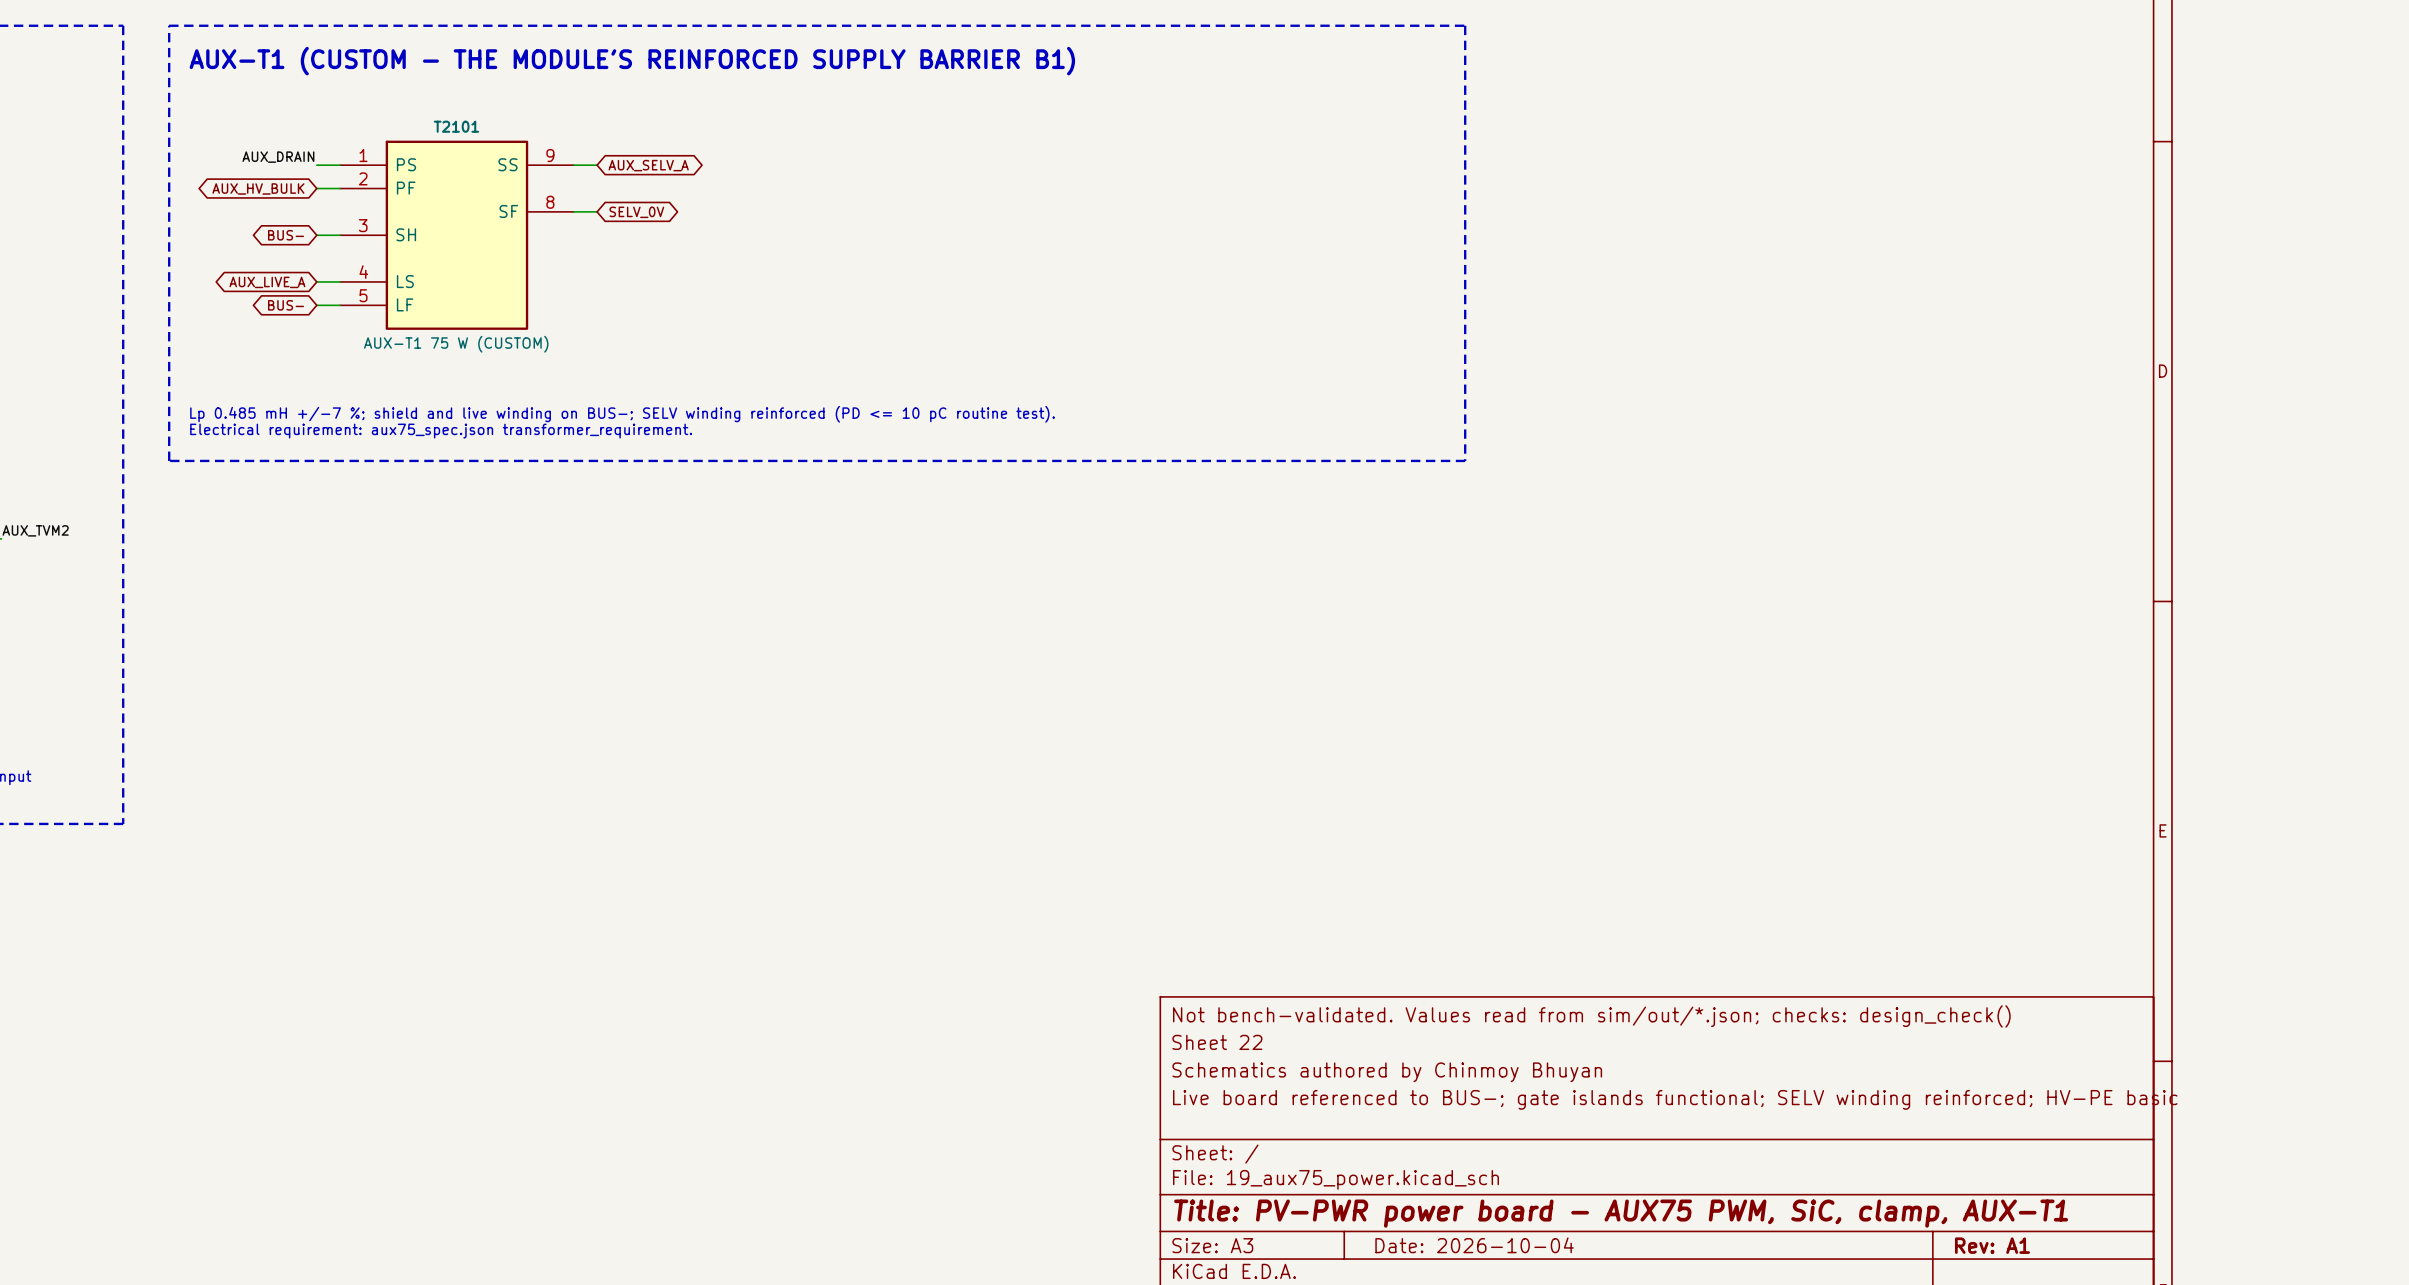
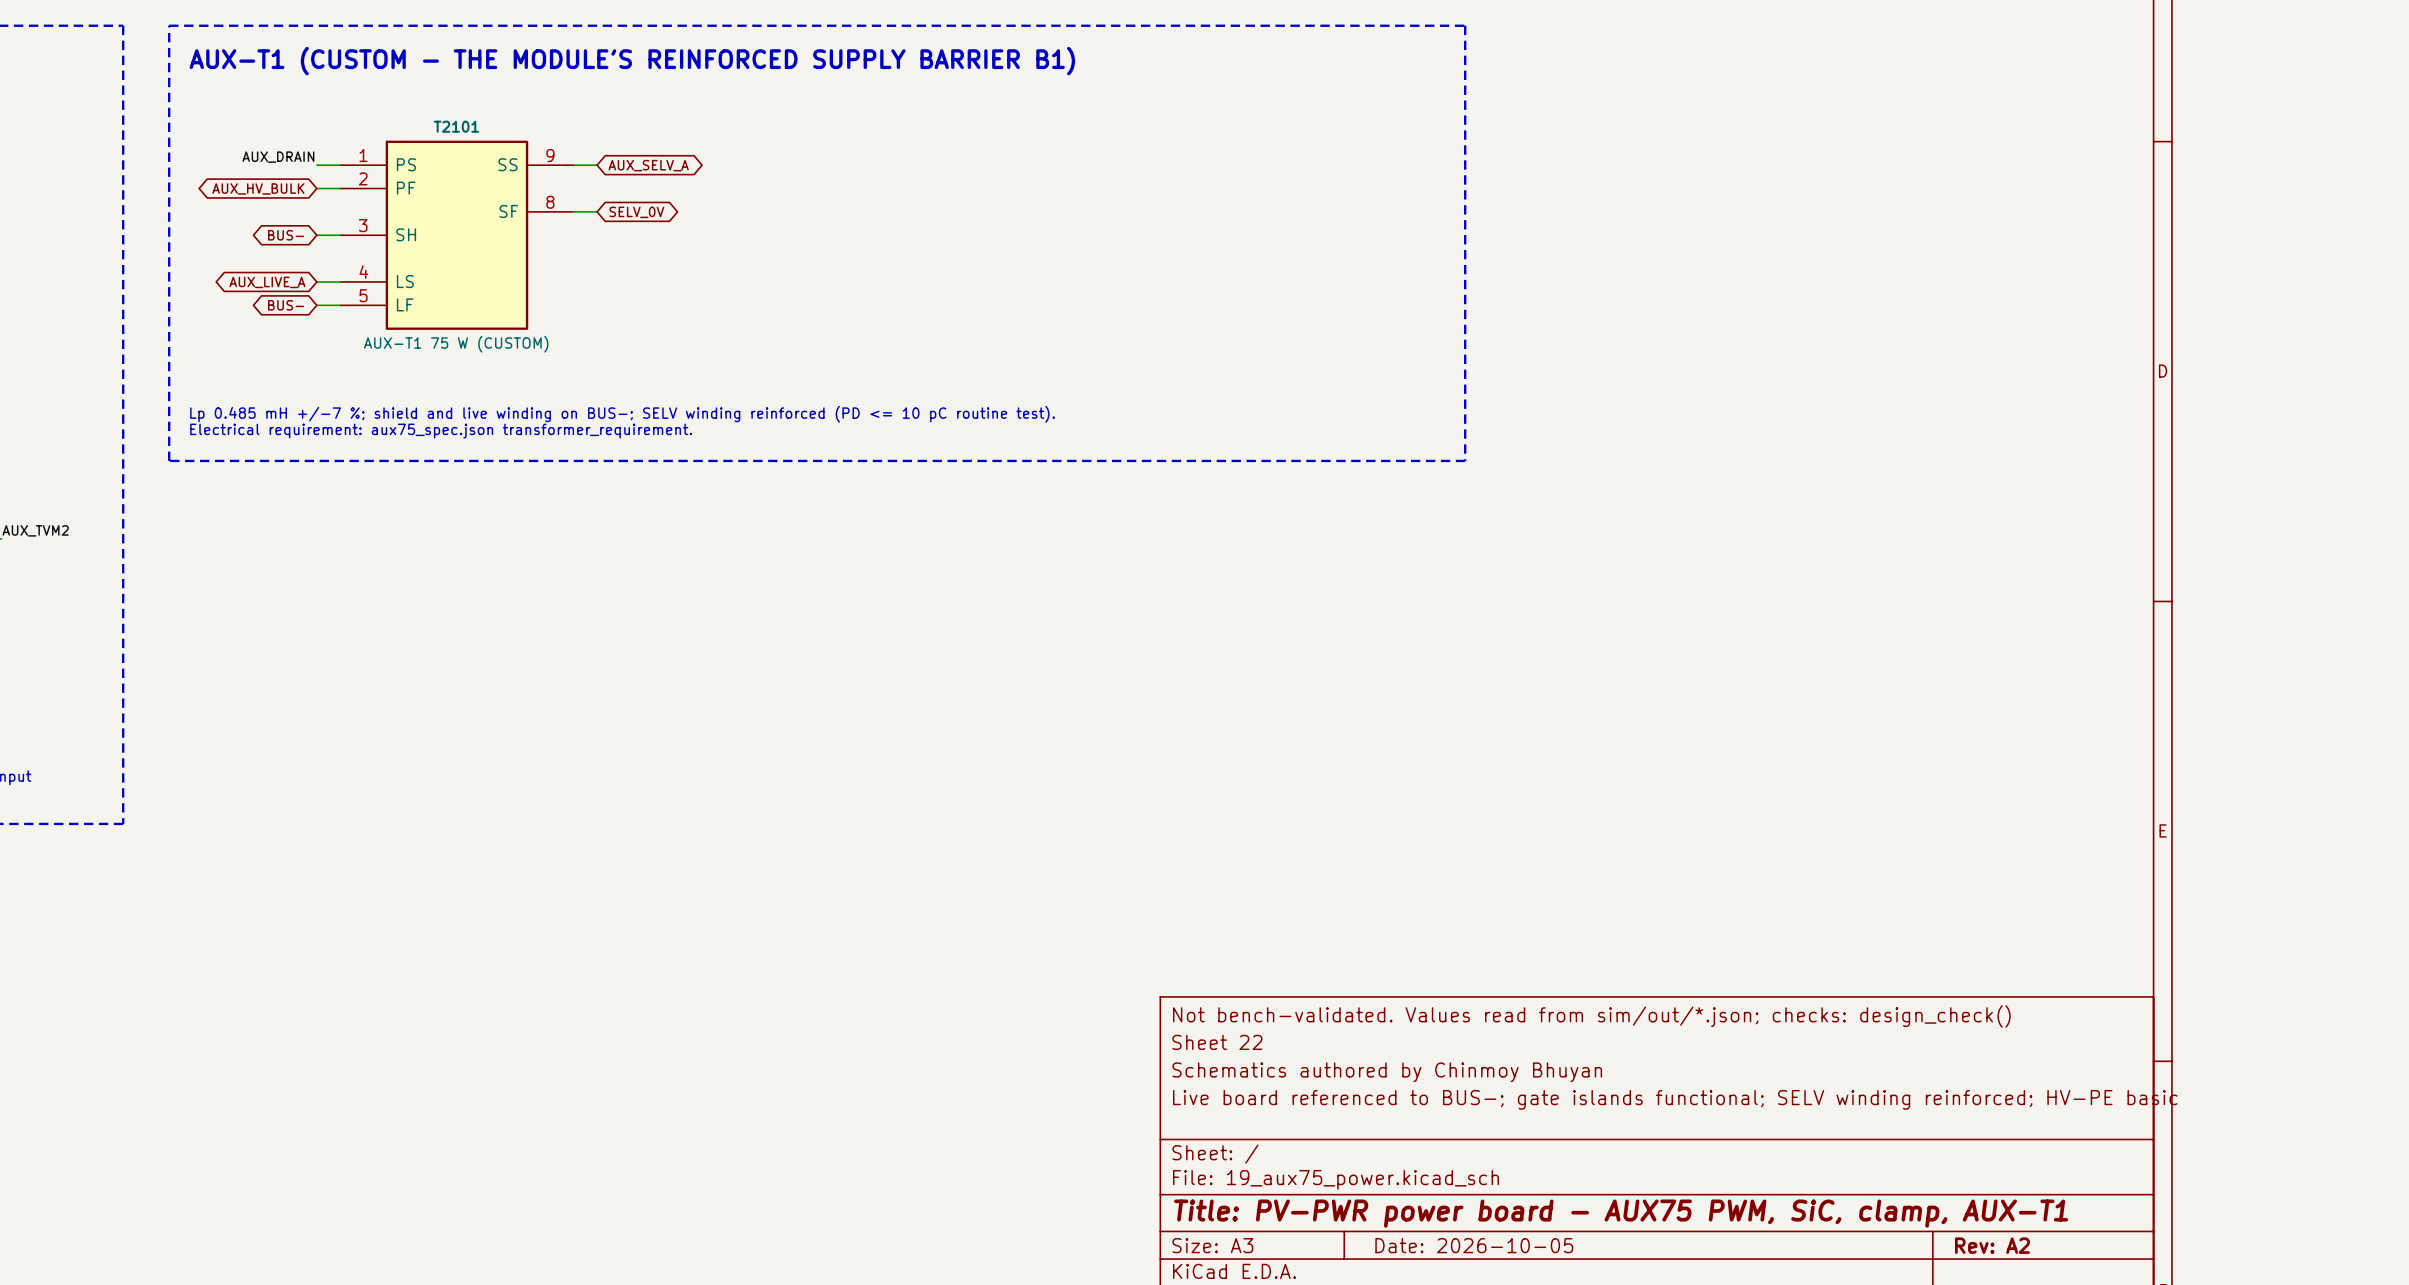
title block: Date: 2026-10-04 (1474, 1245) -> Date: 2026-10-05 (1474, 1245)
title block: Rev: A1 (1992, 1245) -> Rev: A2 (1992, 1245)

